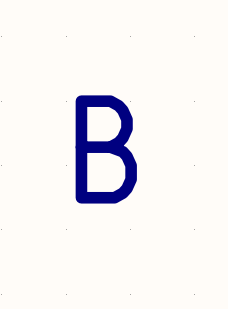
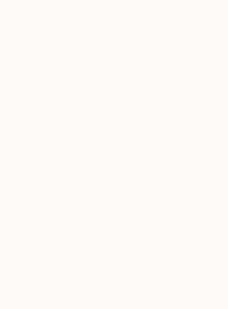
text: B (106, 149) -> none

